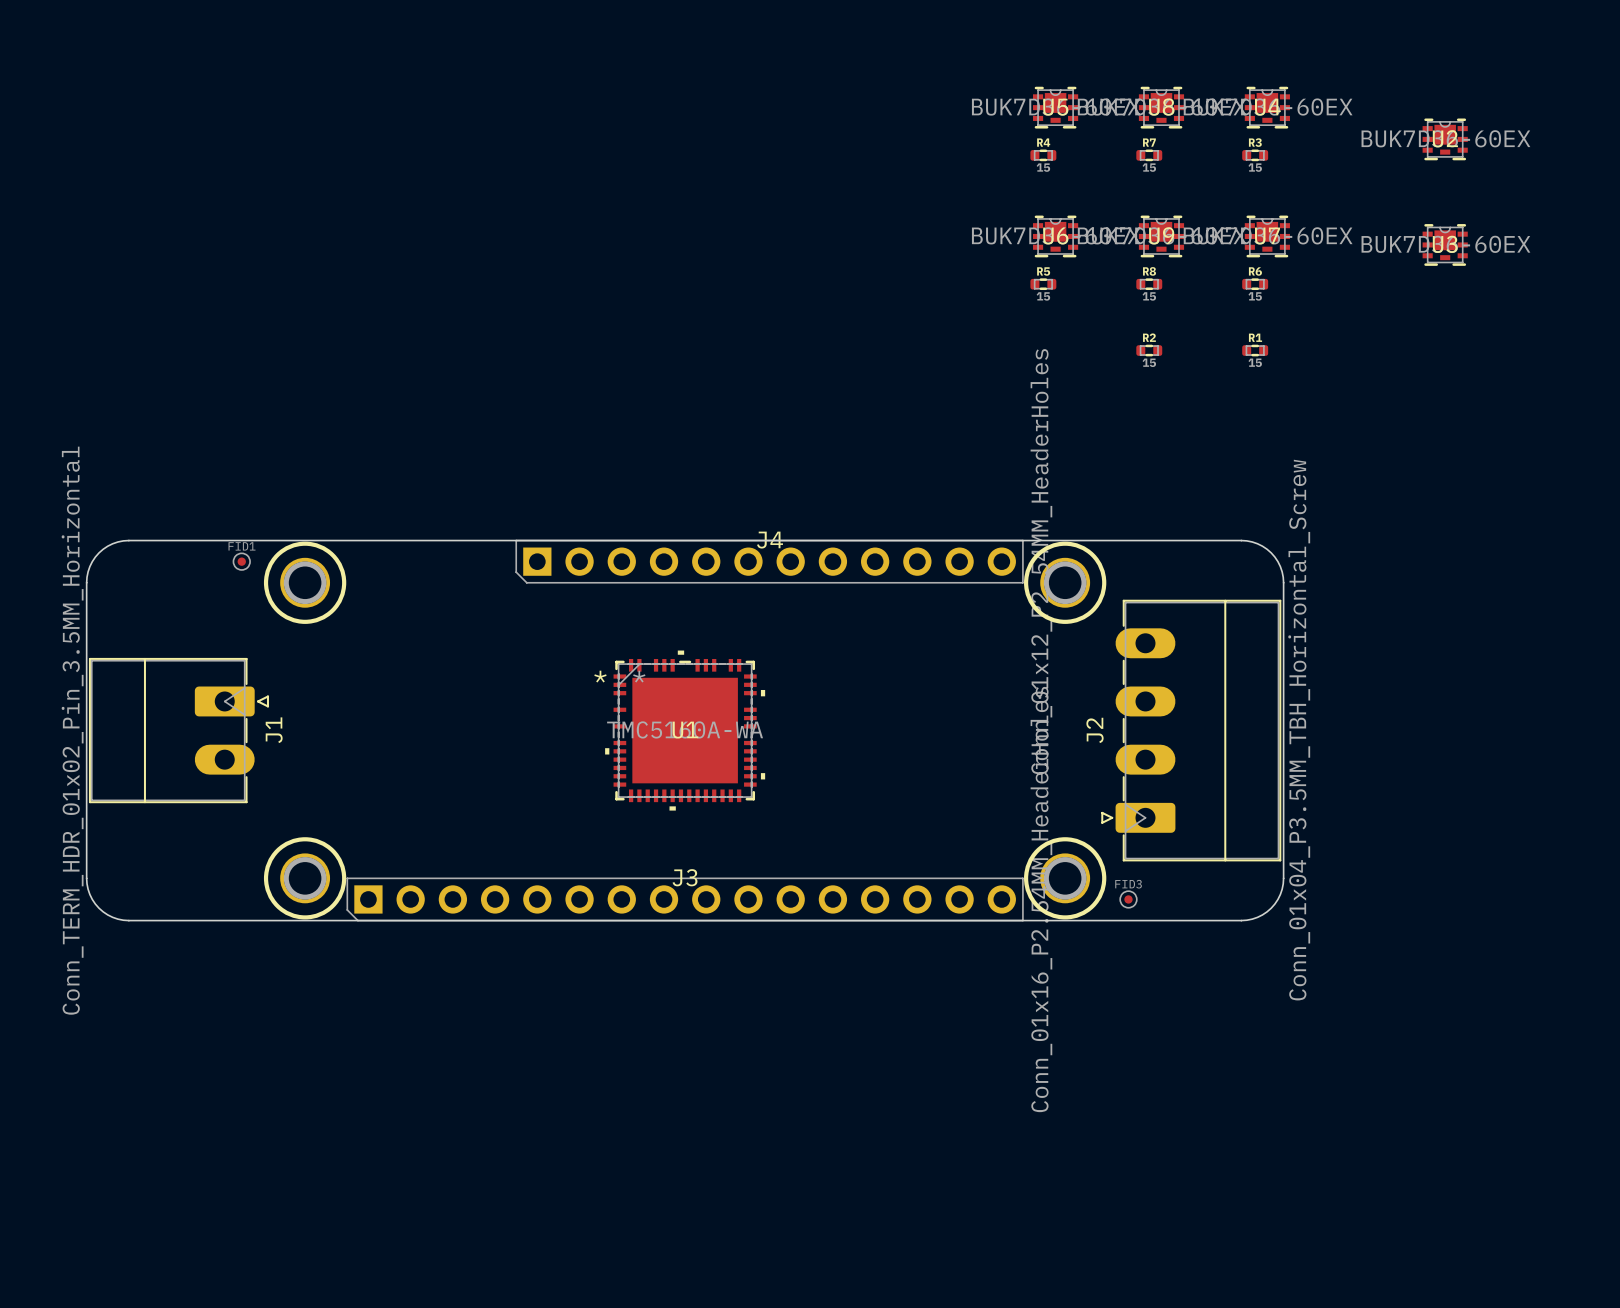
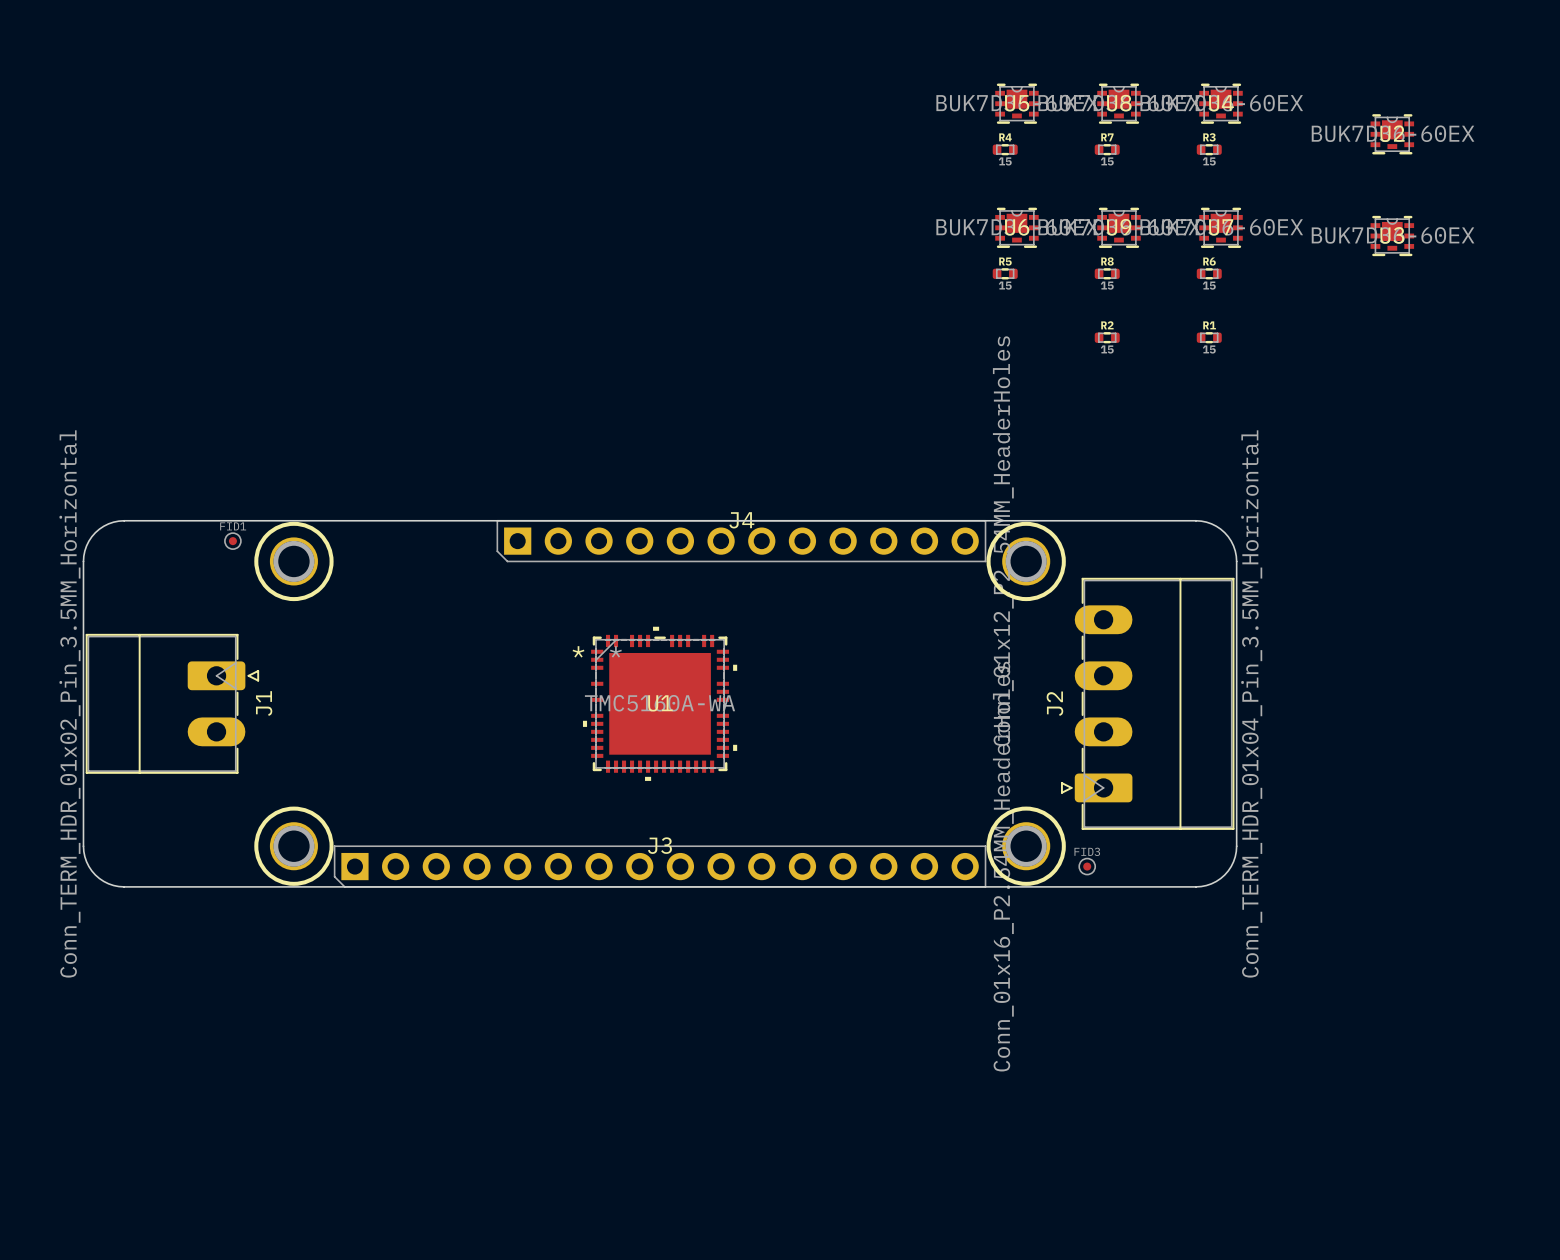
J2 value: Conn_01x04_P3.5MM_TBH_Horizontal_Screw (1299, 730) -> Conn_TERM_HDR_01x04_Pin_3.5MM_Horizontal (1251, 703)

